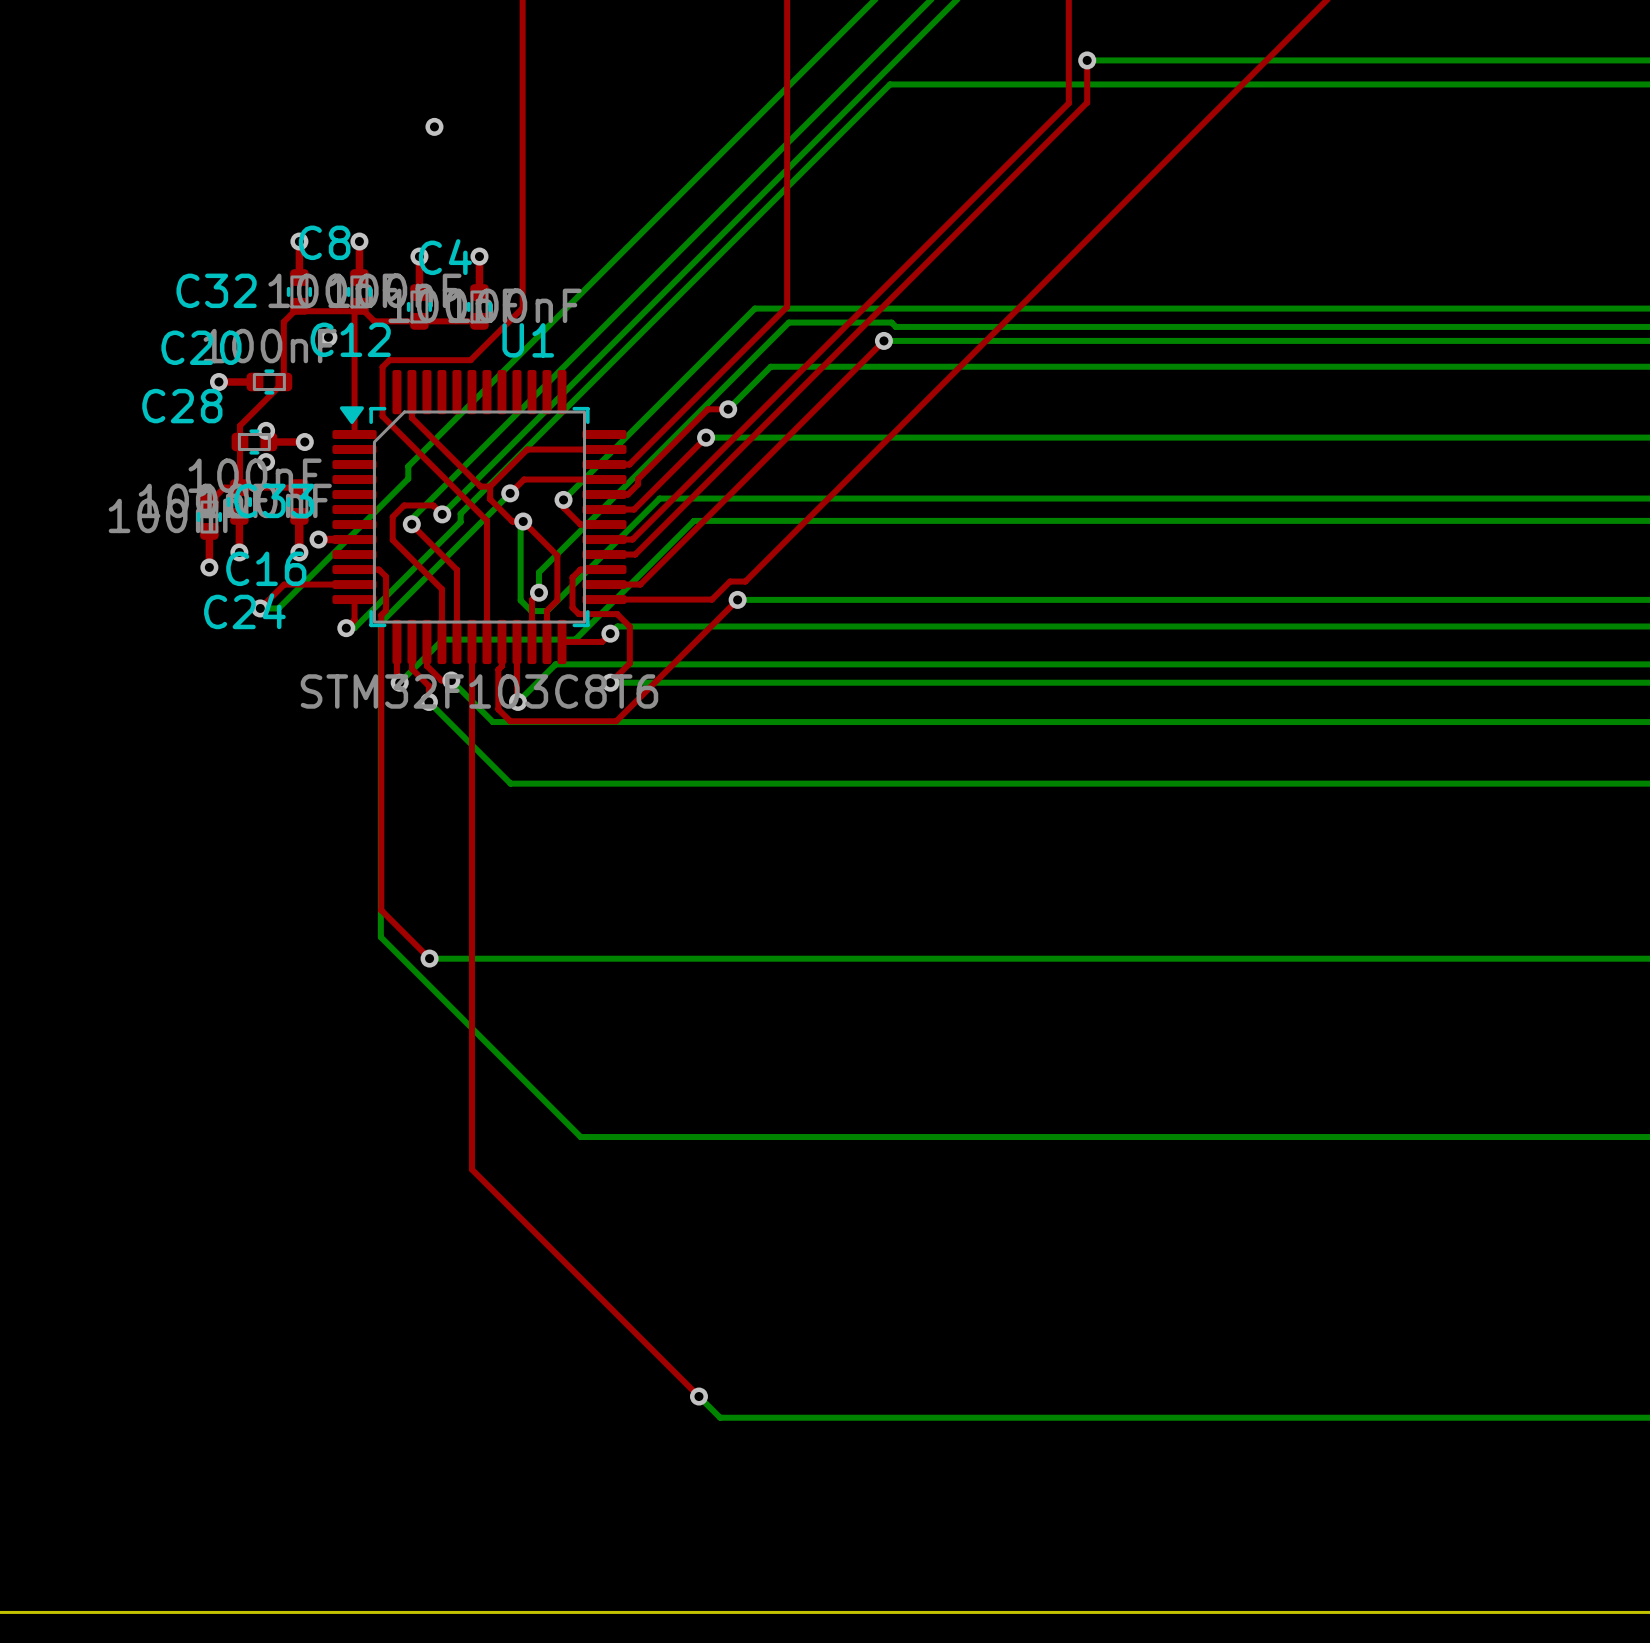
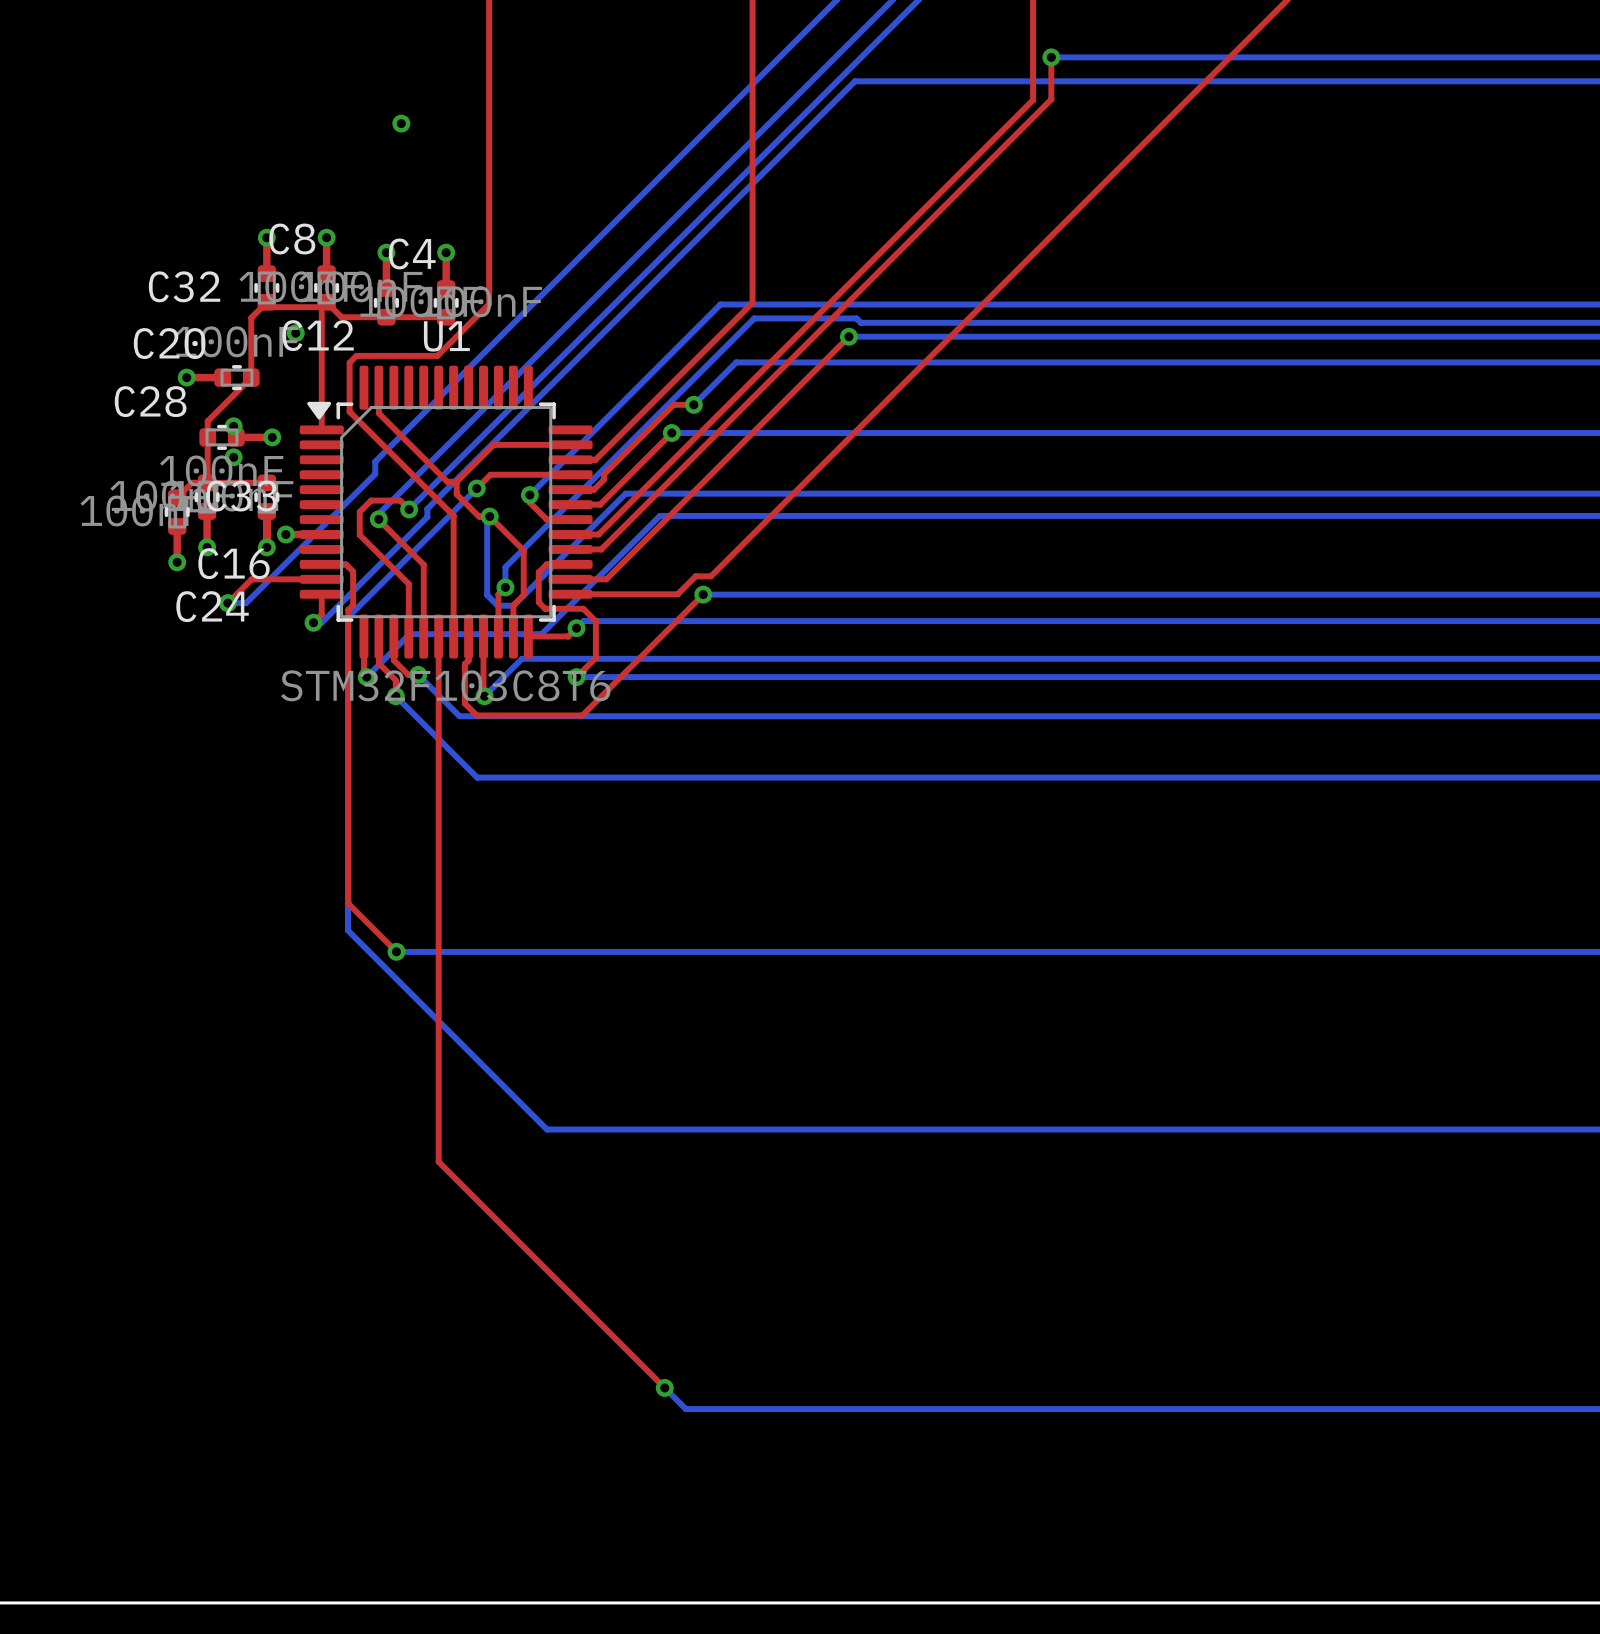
U1 name position: U1 (528, 340) -> U1 (446, 336)

